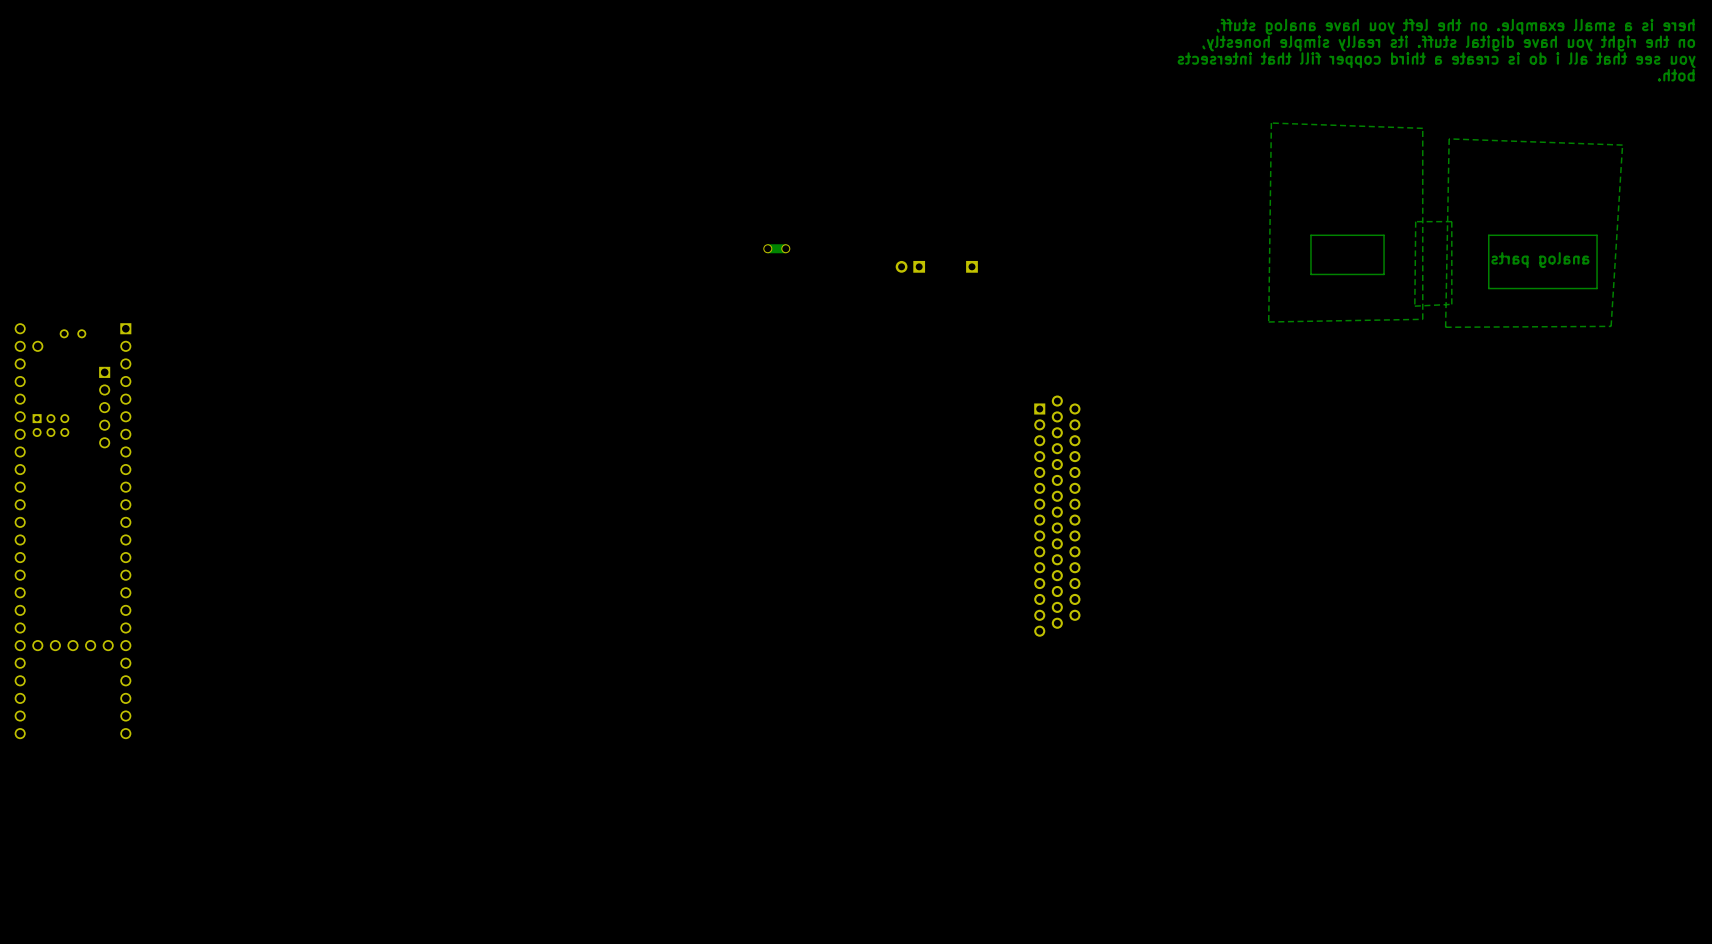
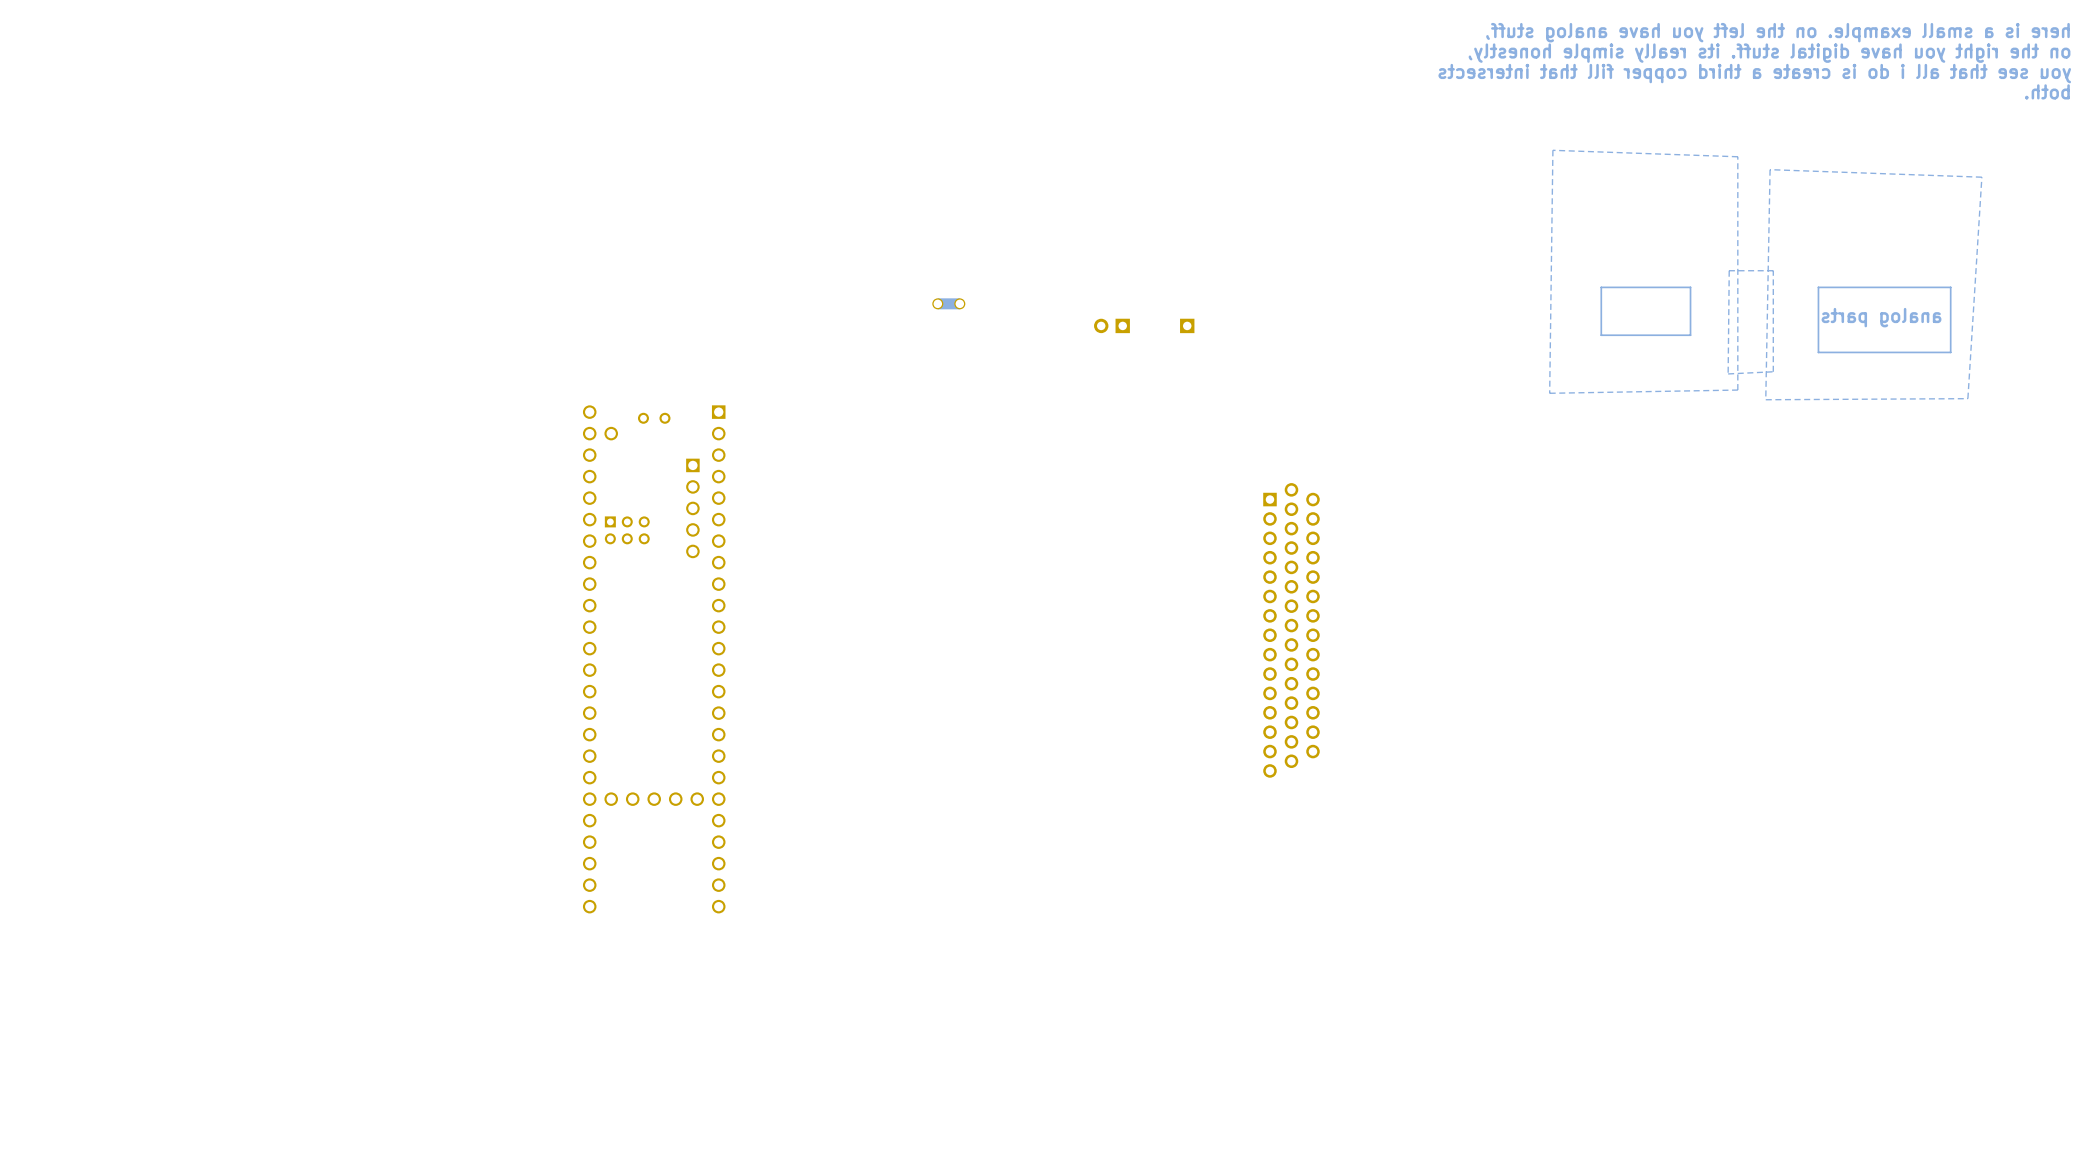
part: (72, 531) -> none
part: none -> (654, 659)

